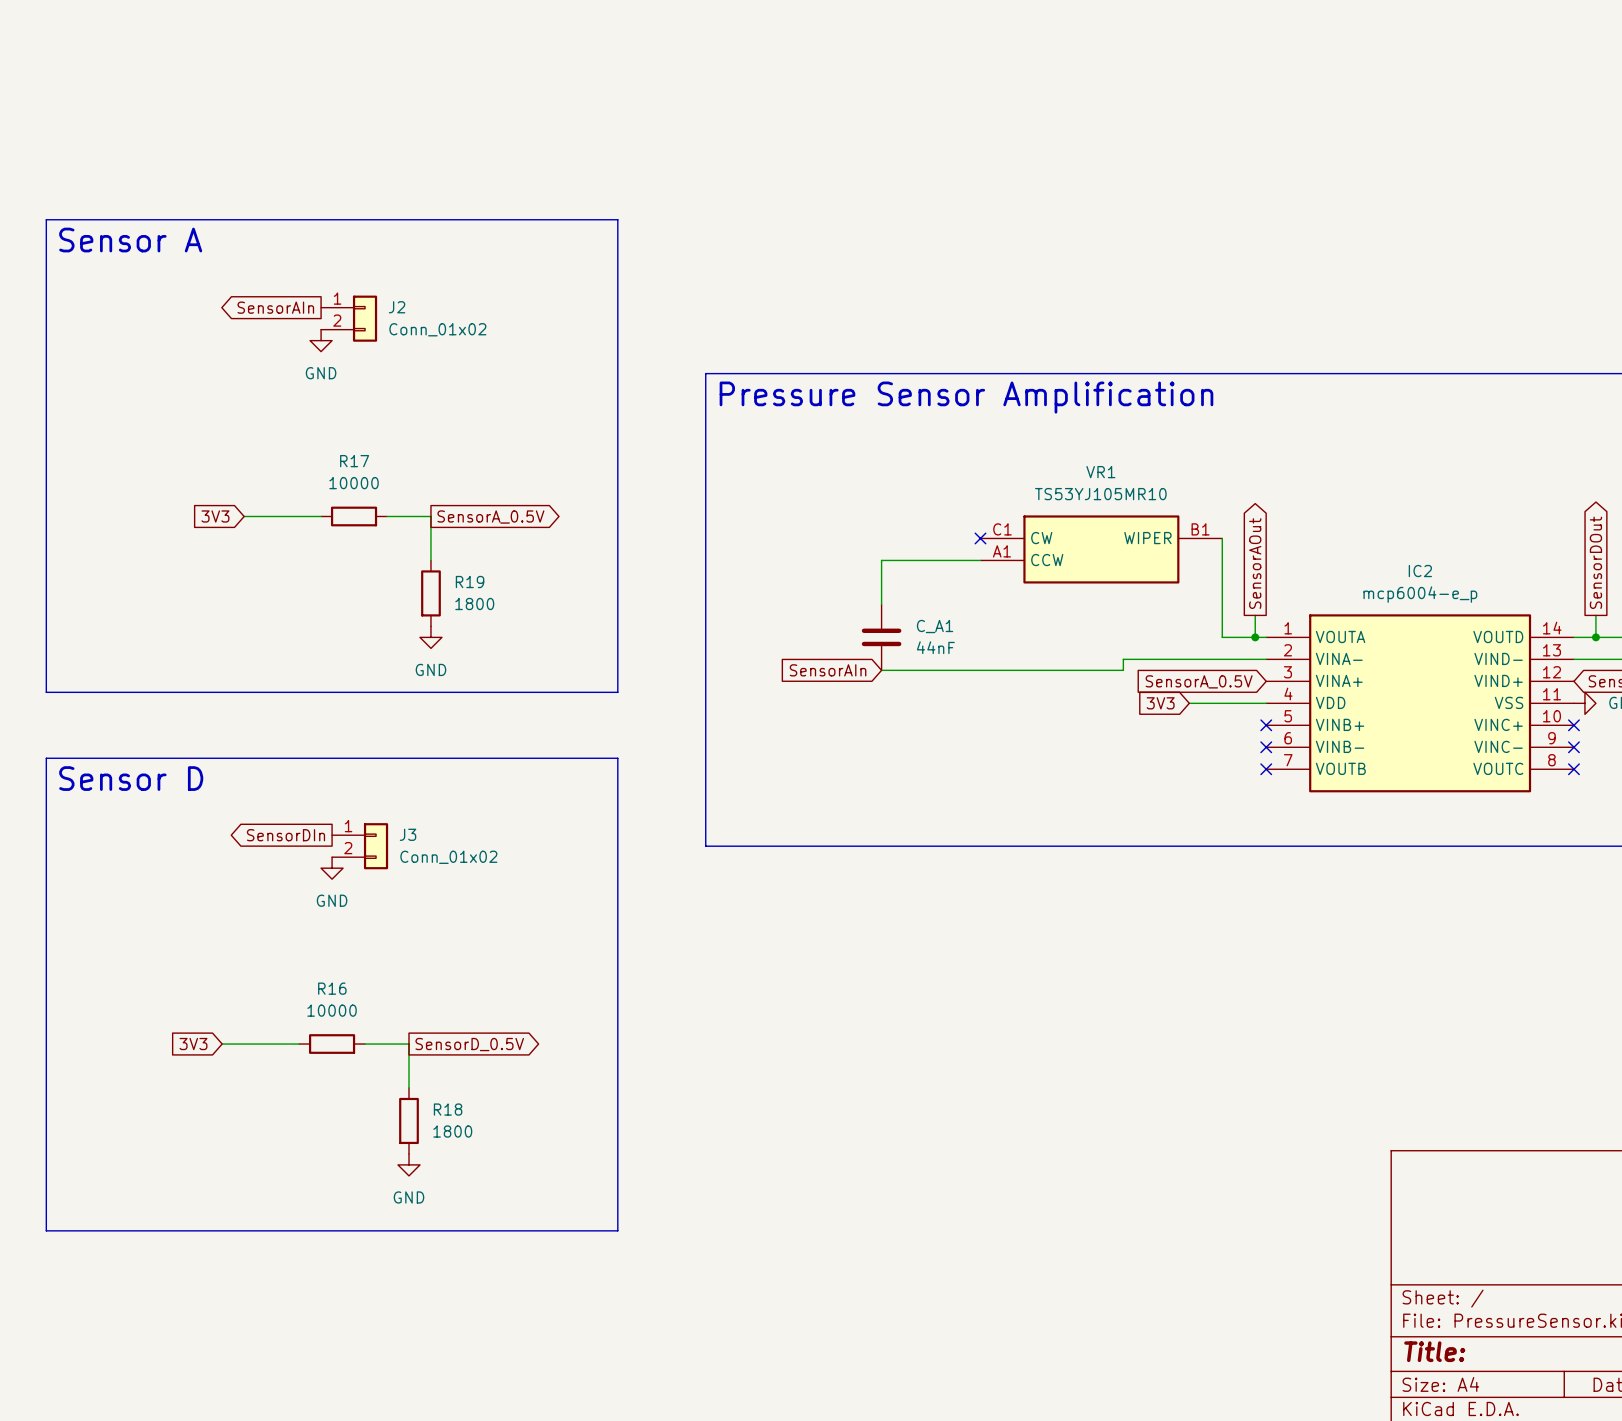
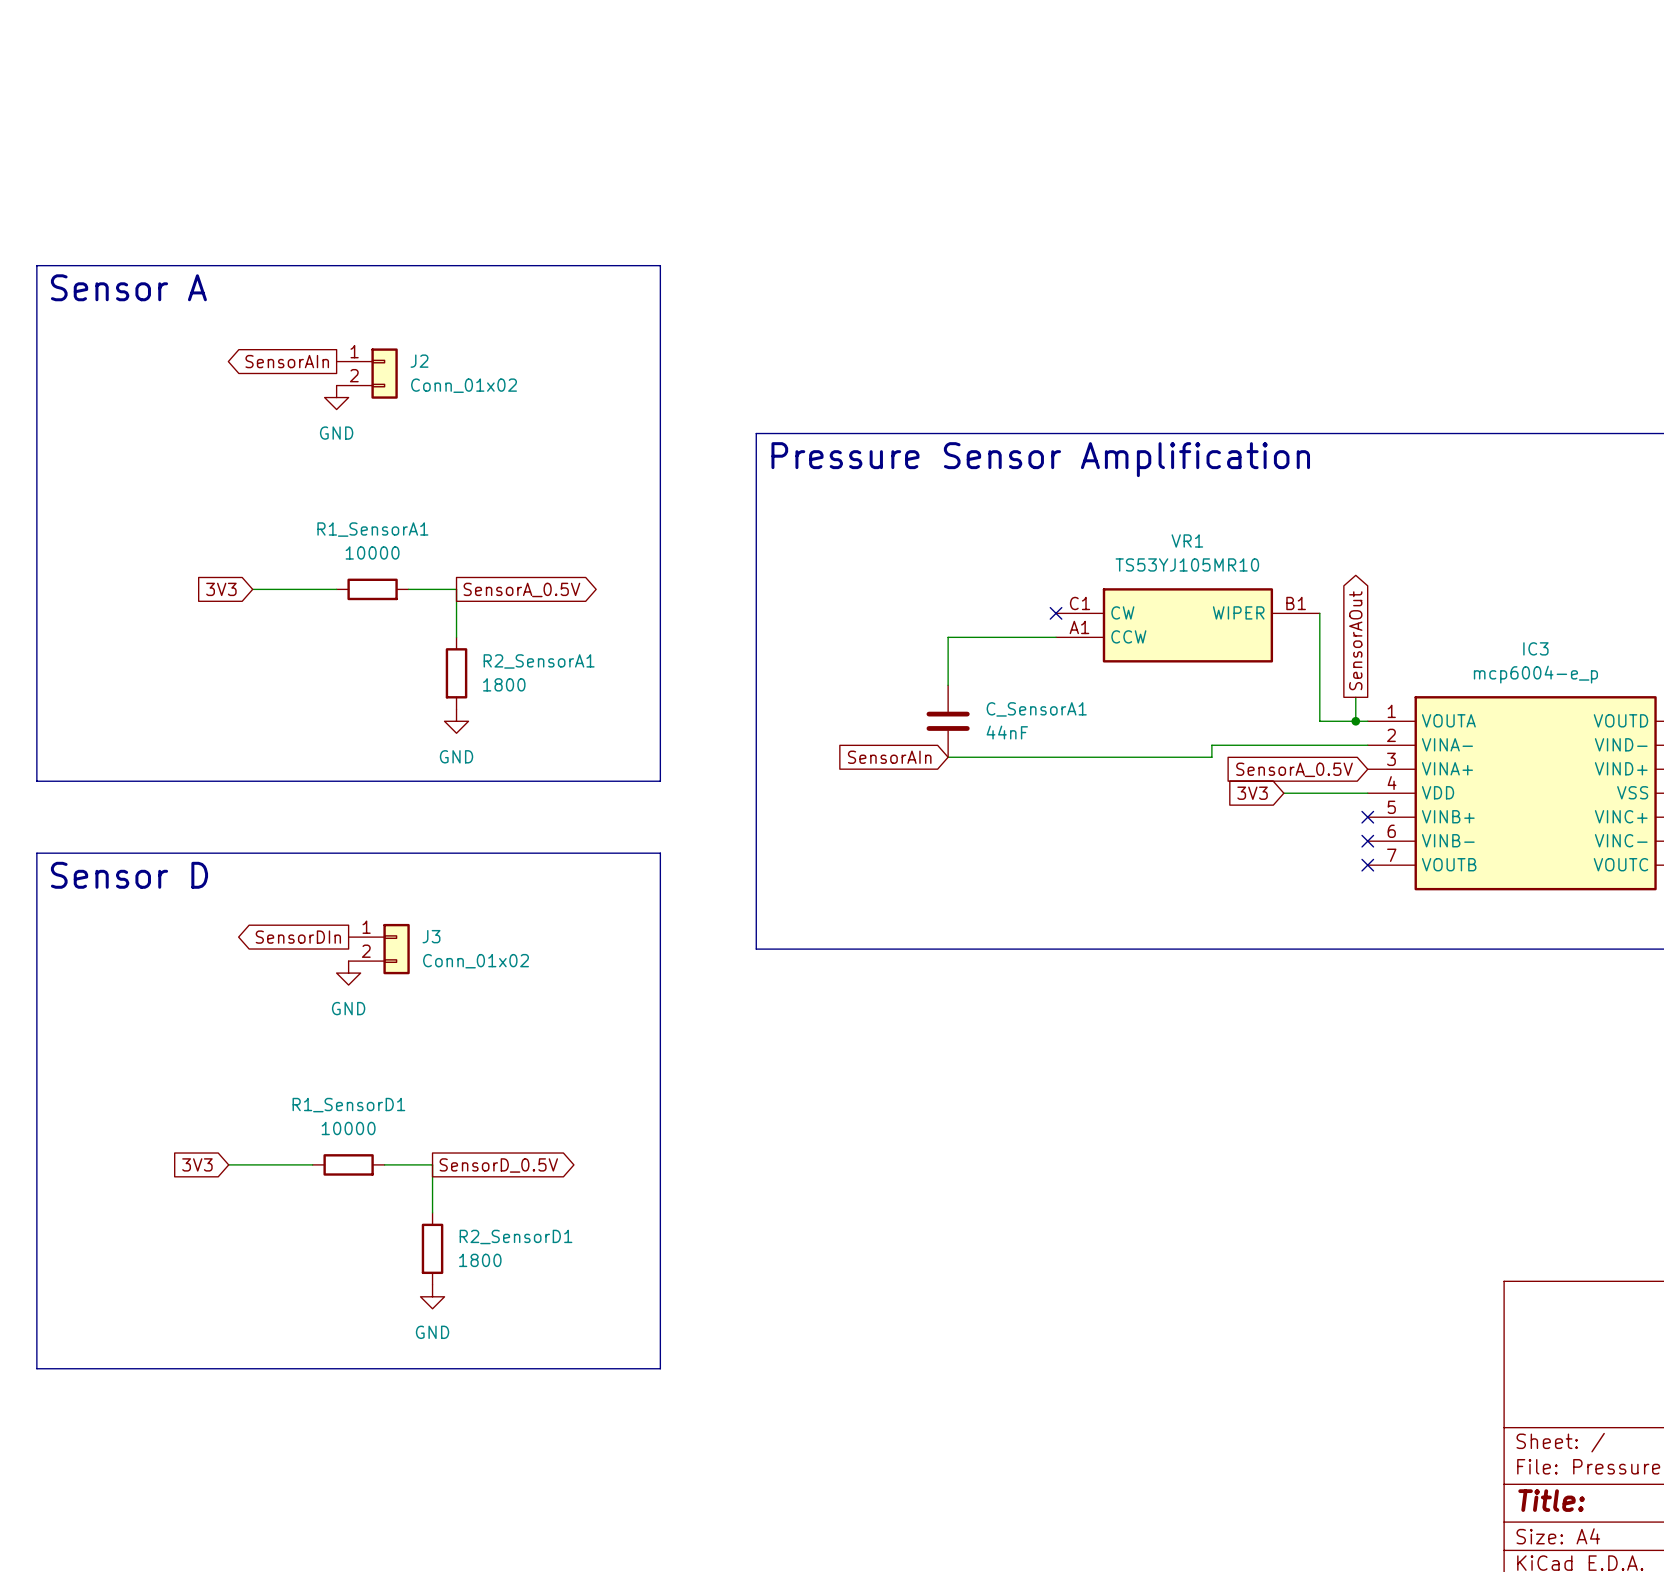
R17 name: R17 (354, 461) -> R1_SensorA1 (372, 529)
IC2 name: IC2 (1420, 571) -> IC3 (1535, 648)
R19 name: R19 (470, 582) -> R2_SensorA1 (539, 661)
C_A1 name: C_A1 (935, 626) -> C_SensorA1 (1036, 709)
R16 name: R16 (332, 988) -> R1_SensorD1 (348, 1105)
R18 name: R18 (448, 1109) -> R2_SensorD1 (515, 1236)

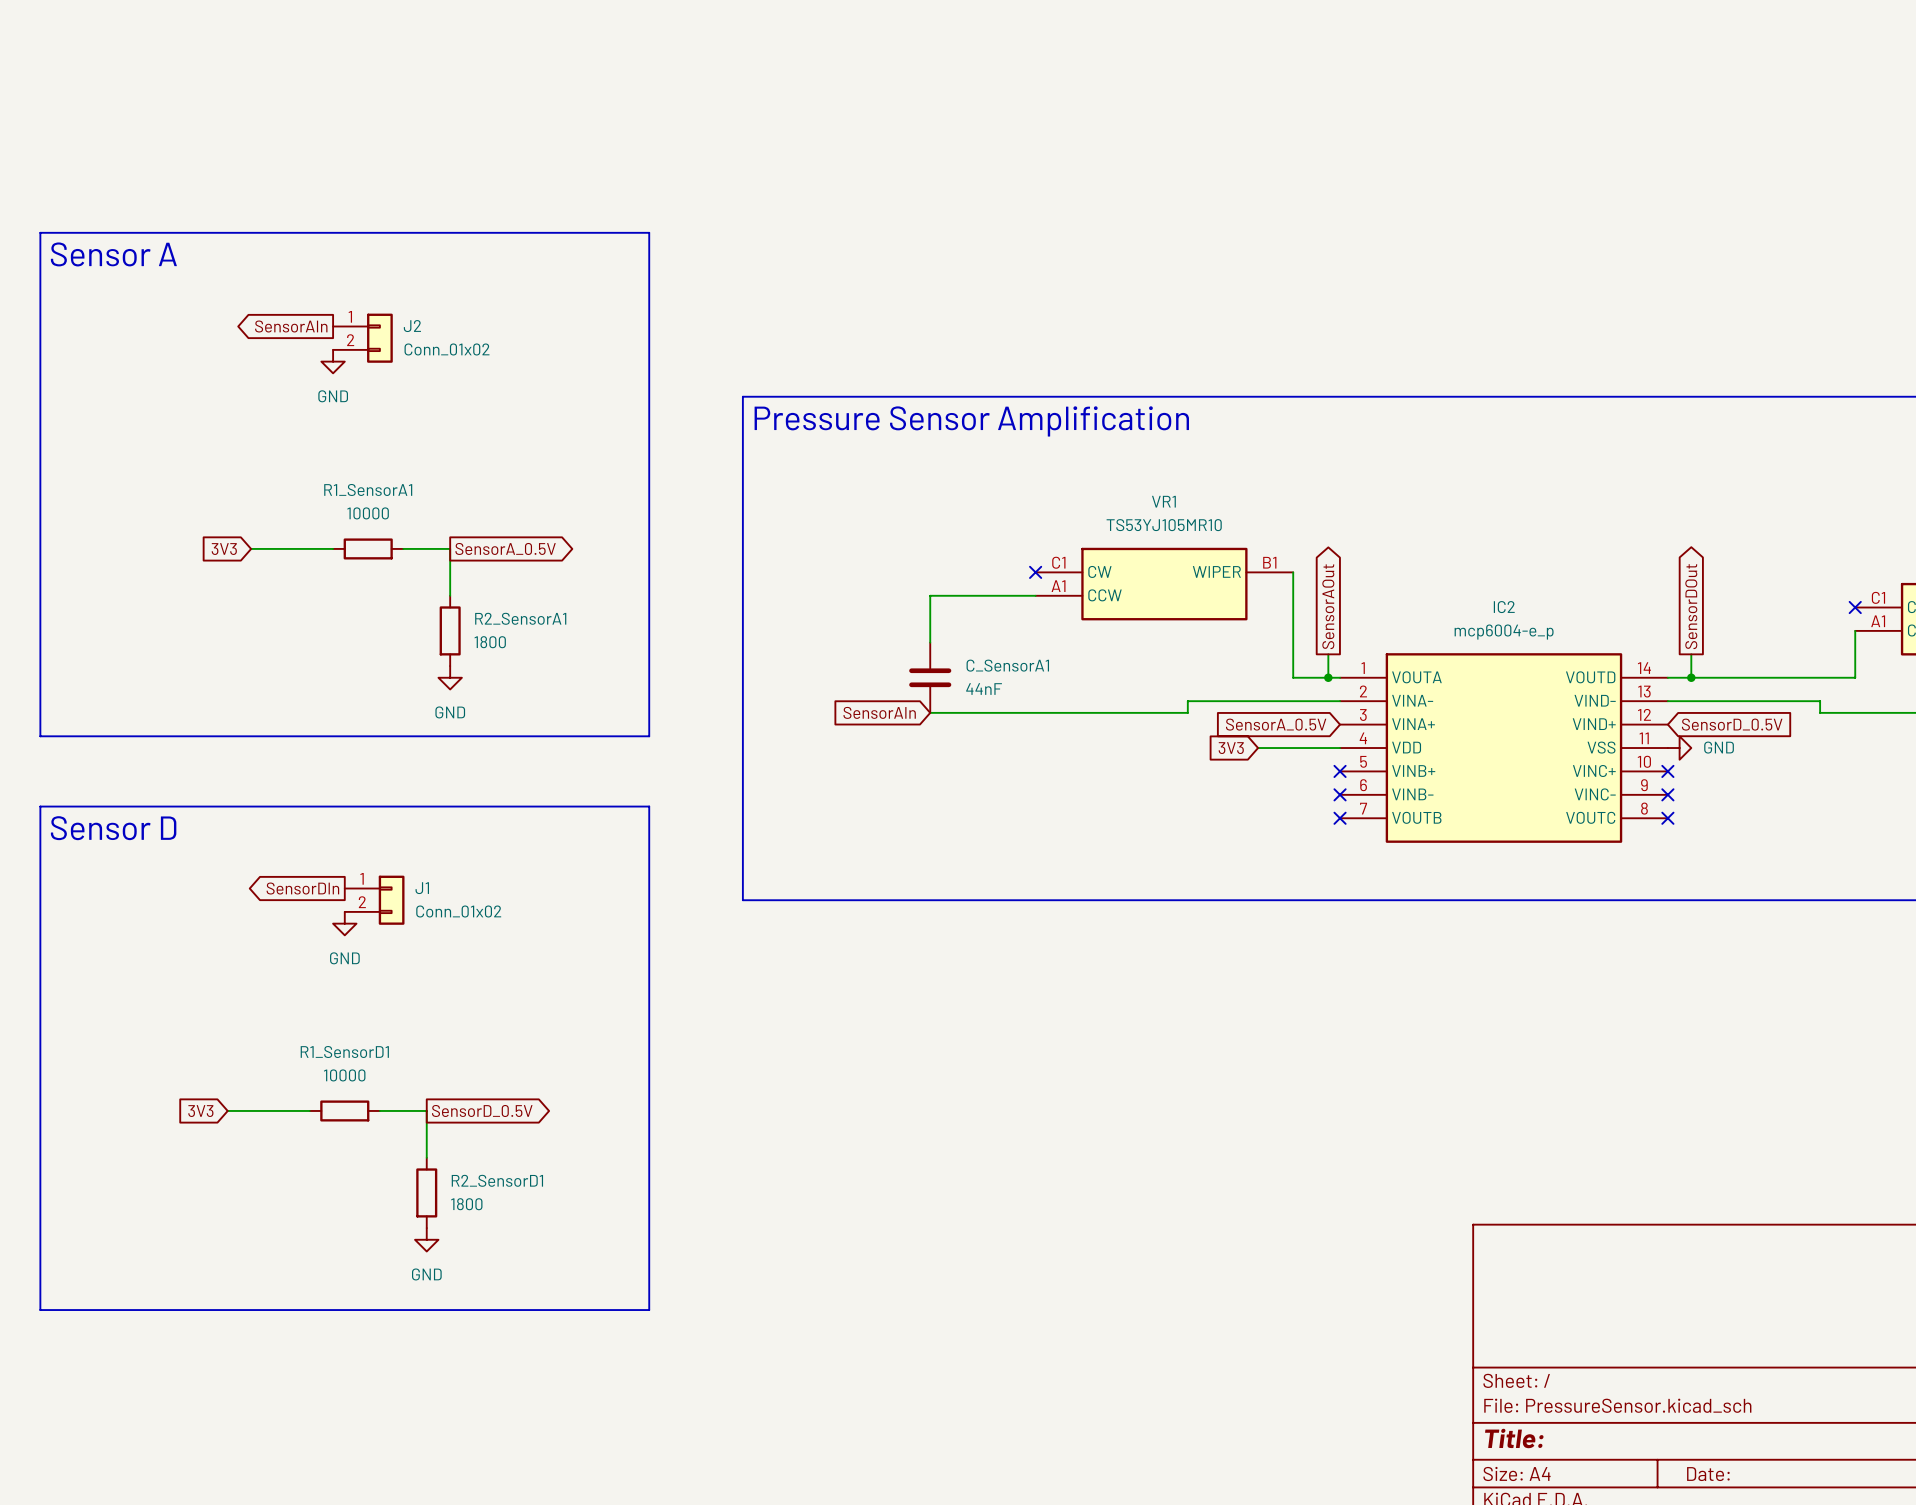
IC3 name: IC3 (1535, 648) -> IC2 (1504, 607)
J3 name: J3 (431, 936) -> J1 (422, 888)

